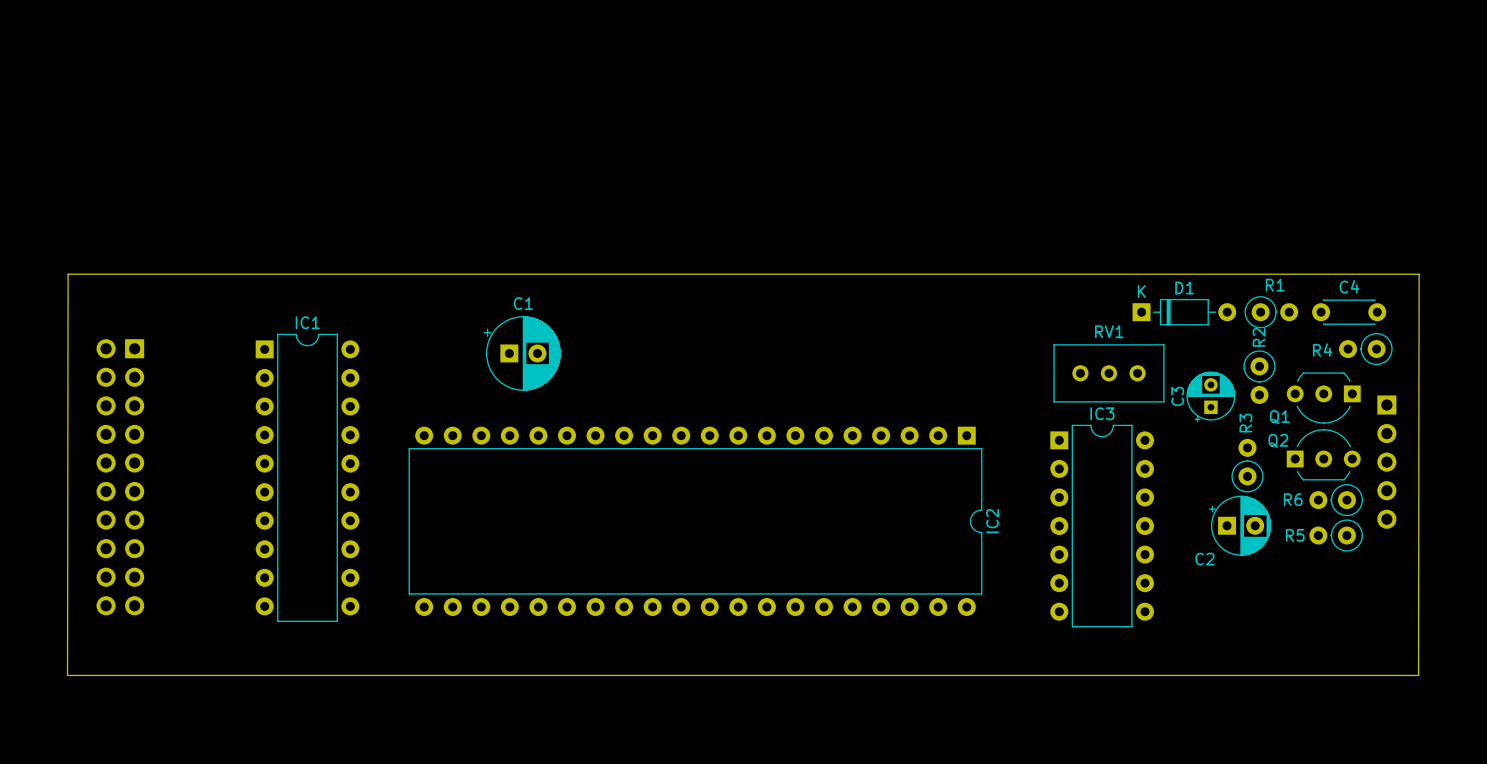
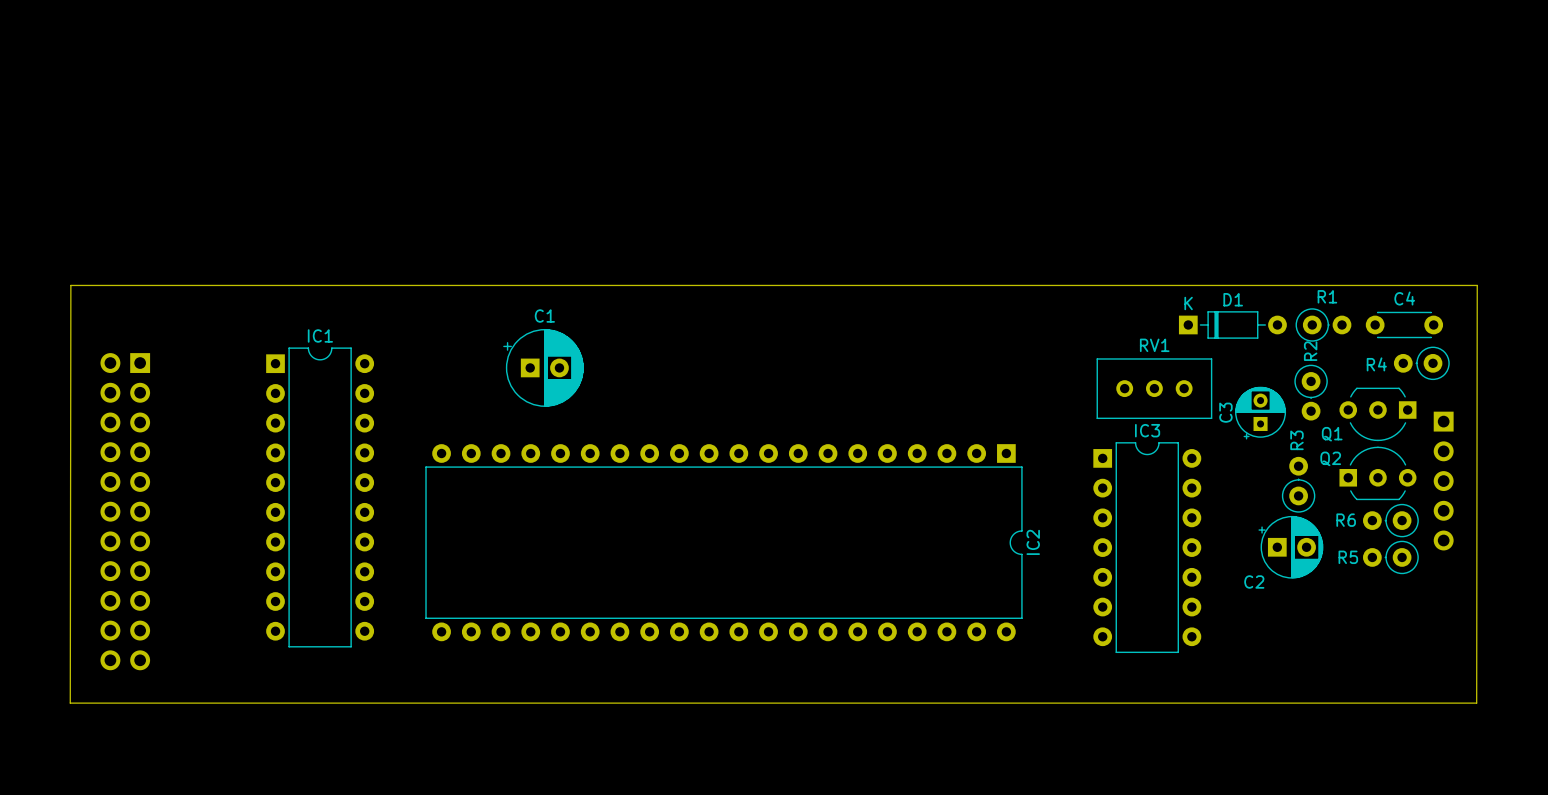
part: none -> (125, 511)

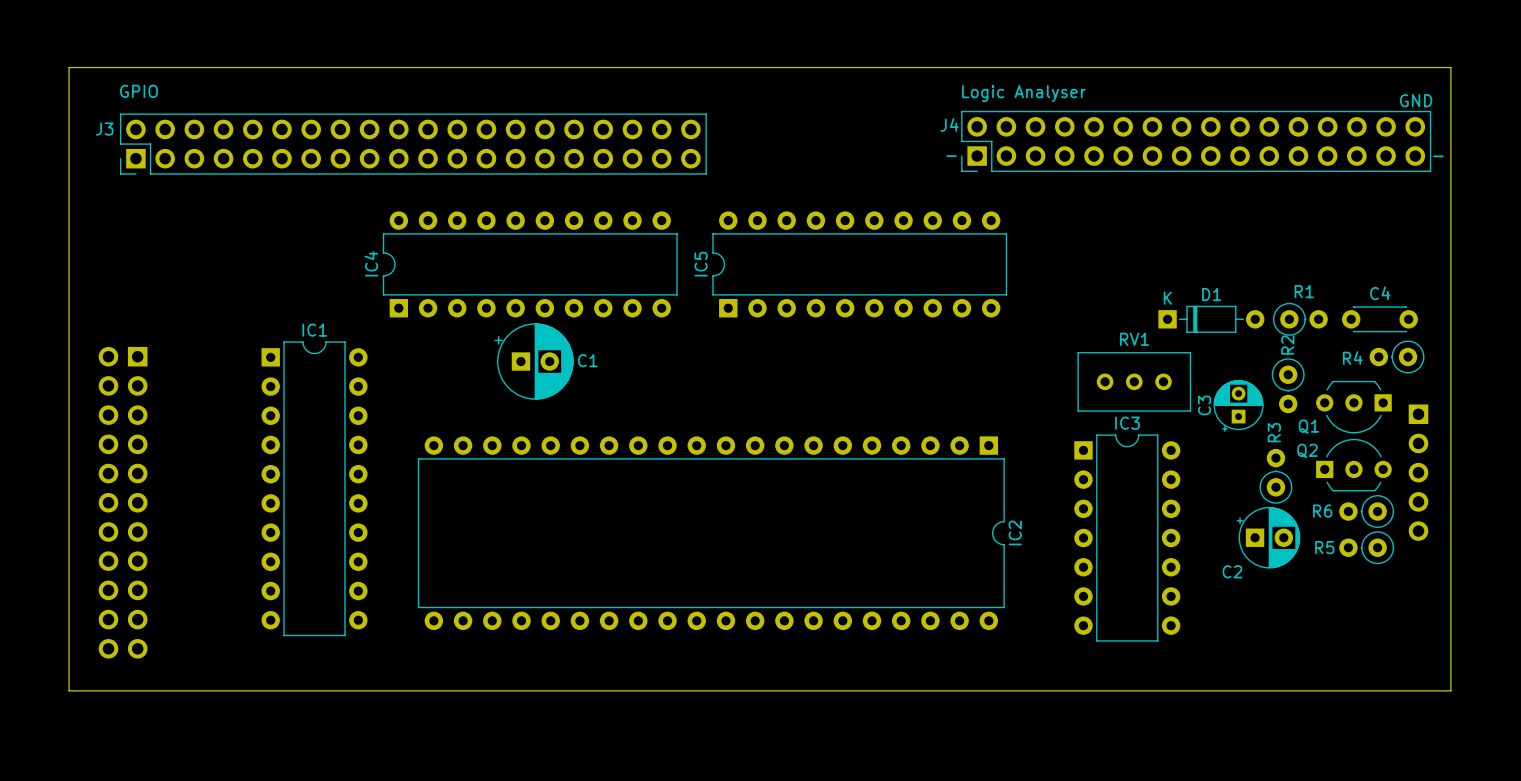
text: none -> GPIO (138, 91)
text: none -> Logic Analyser (1023, 93)
text: none -> GND (1416, 100)
J4: none -> (1196, 141)
J3: none -> (413, 144)
text: none -> - (951, 156)
text: none -> - (1438, 156)
IC4: none -> (530, 264)
IC5: none -> (859, 264)
C1 name position: C1 (544, 316) -> C1 (587, 360)
board edge: (70, 703) (70, 285) (1477, 285) (1476, 703) -> (69, 690) (69, 67) (1450, 67) (1450, 690)

